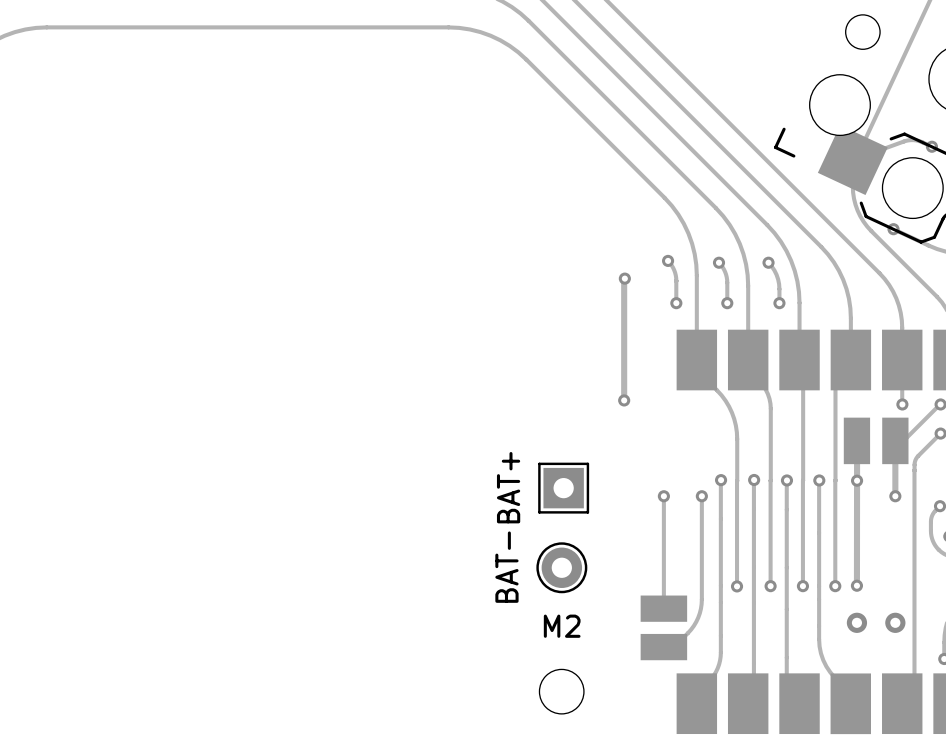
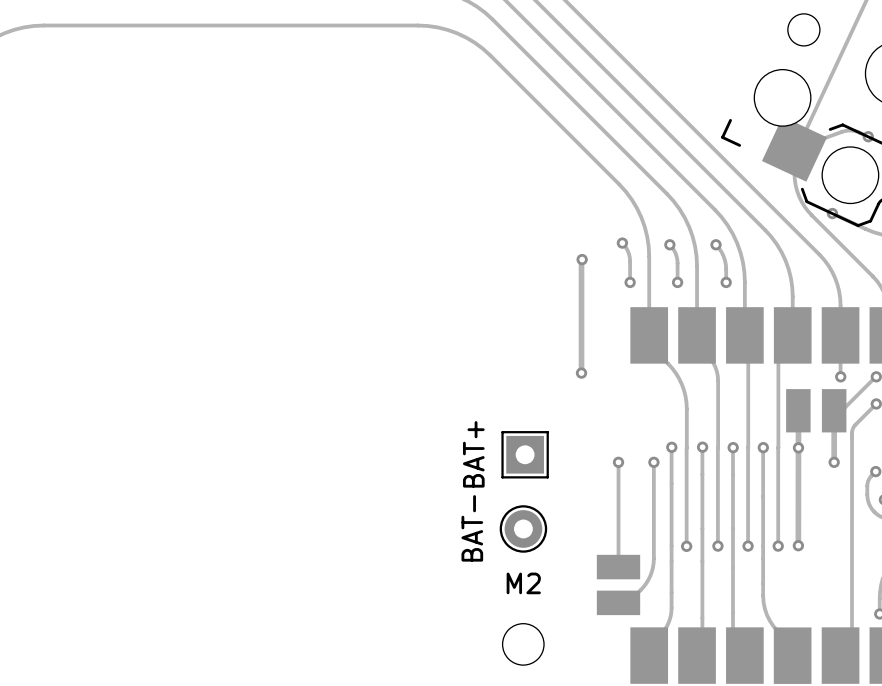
via: (856, 622) -> none
via: (895, 622) -> none

